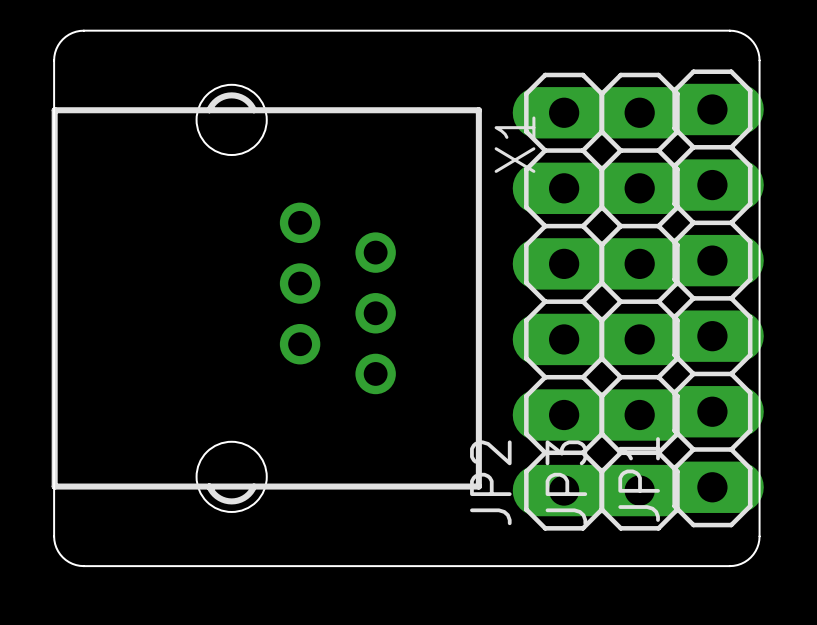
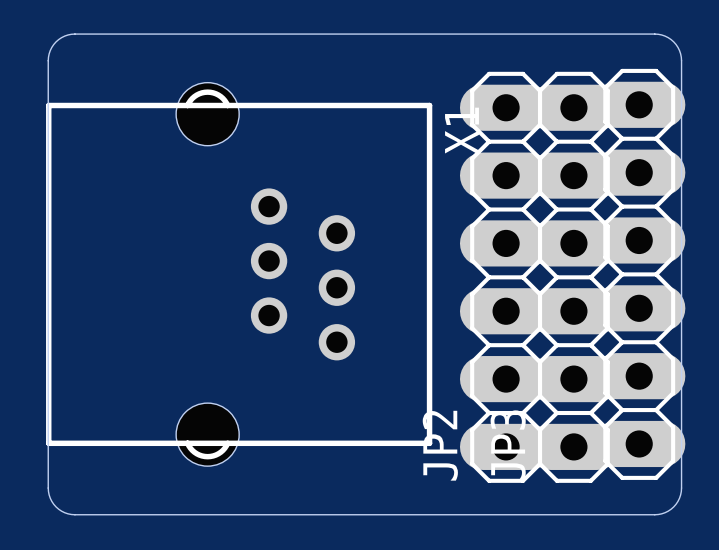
JP1 name: JP1 (639, 479) -> none

